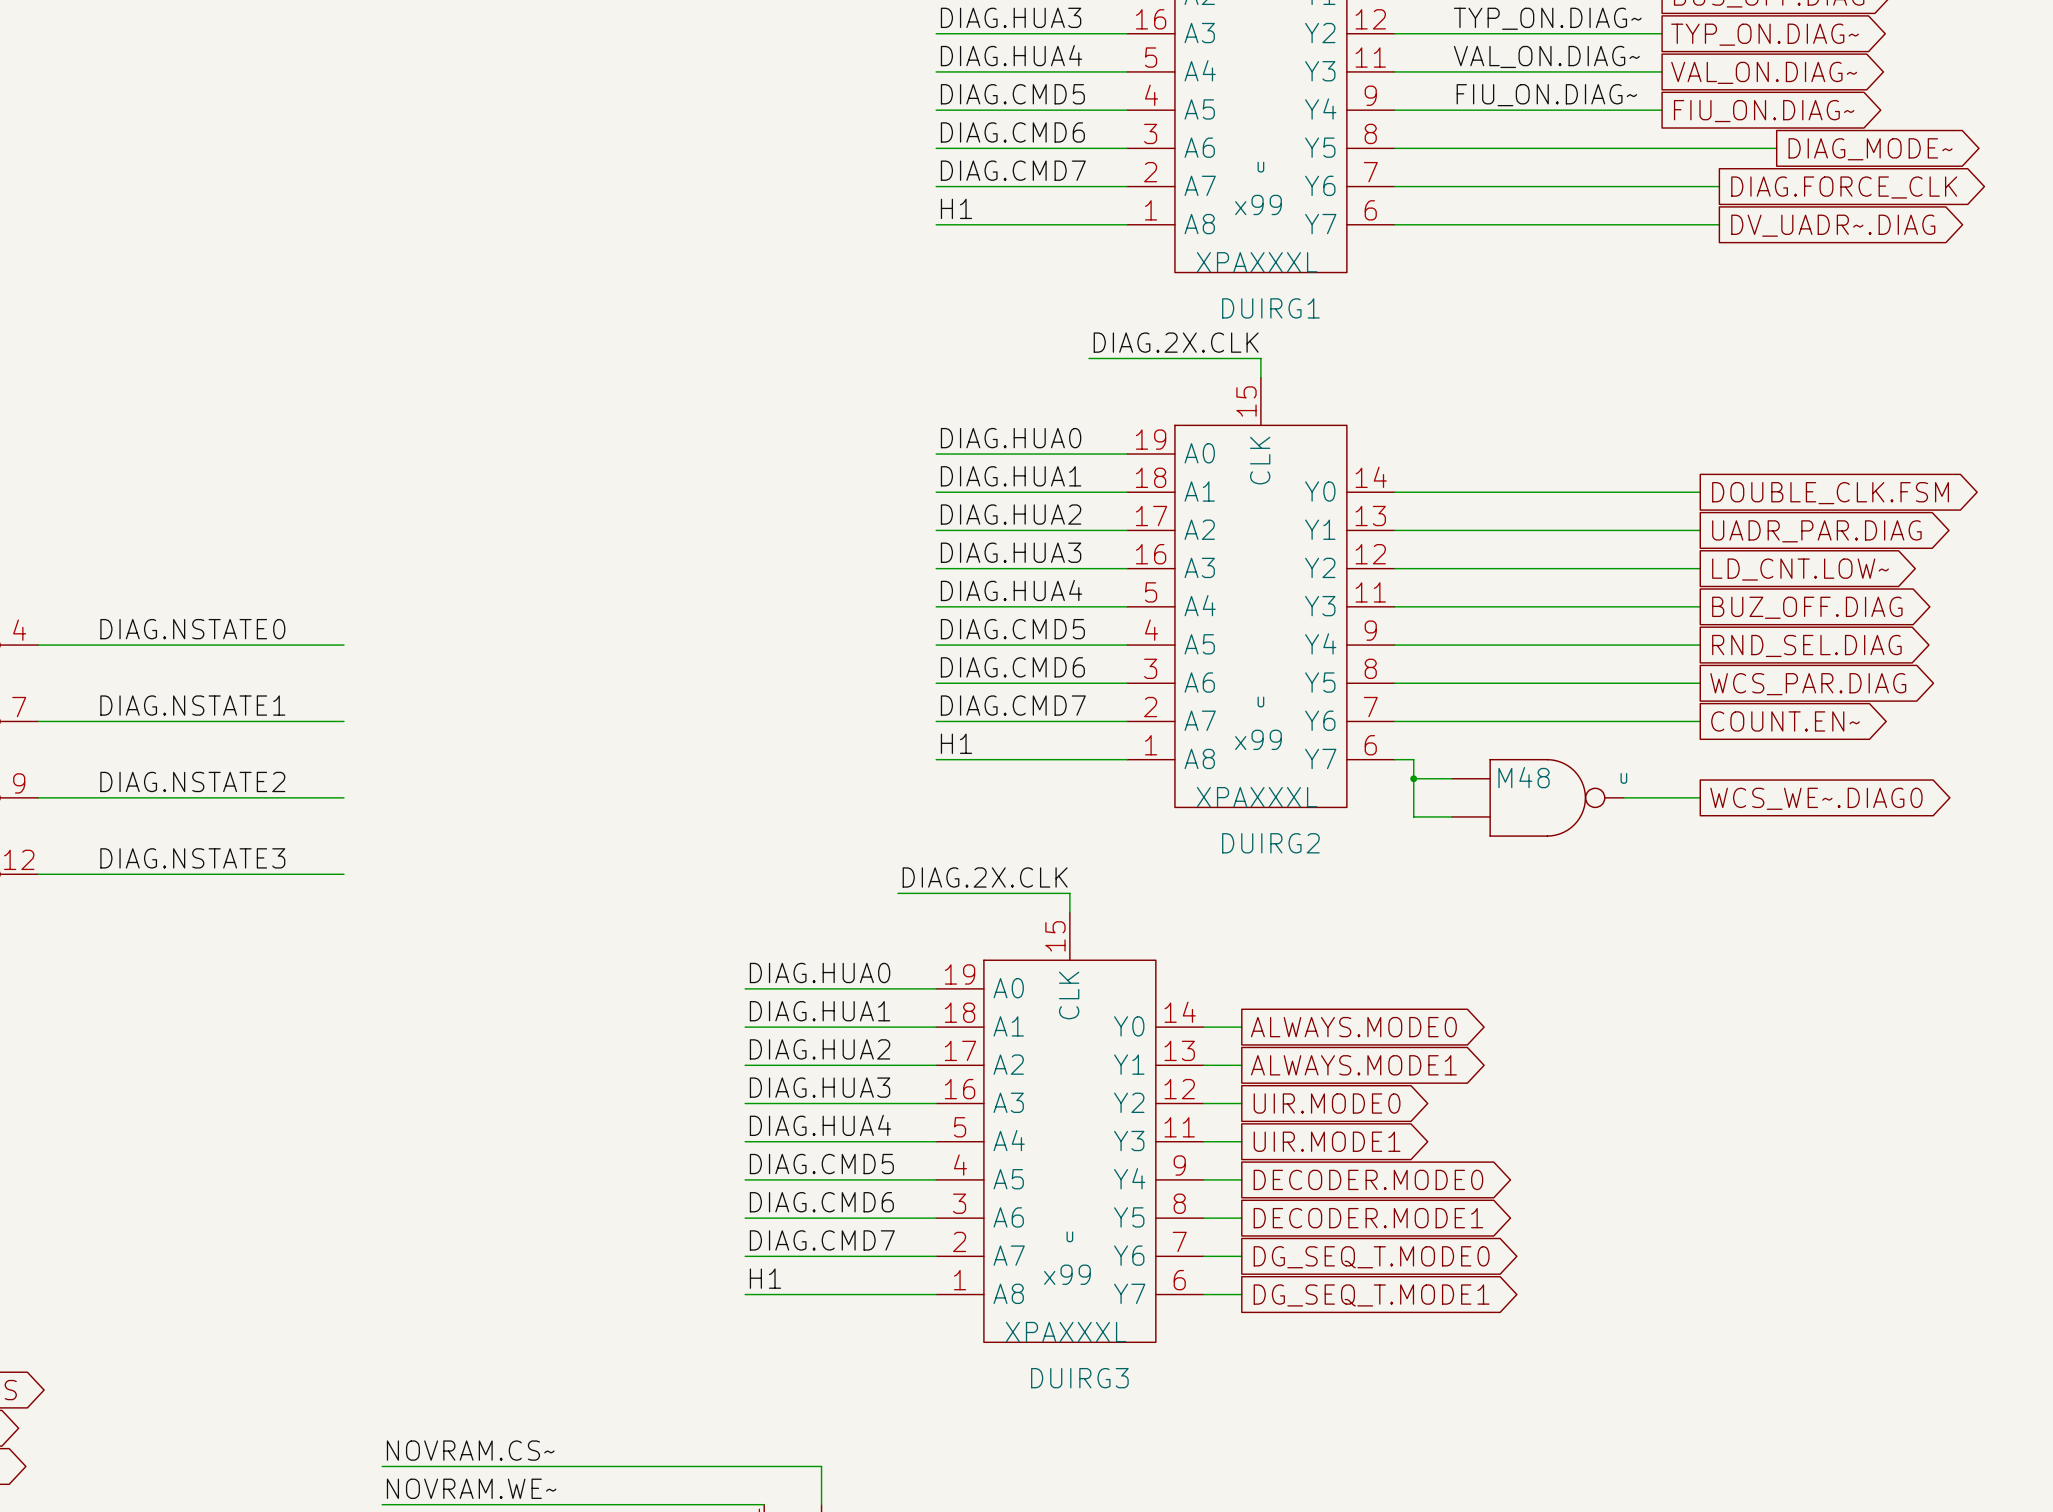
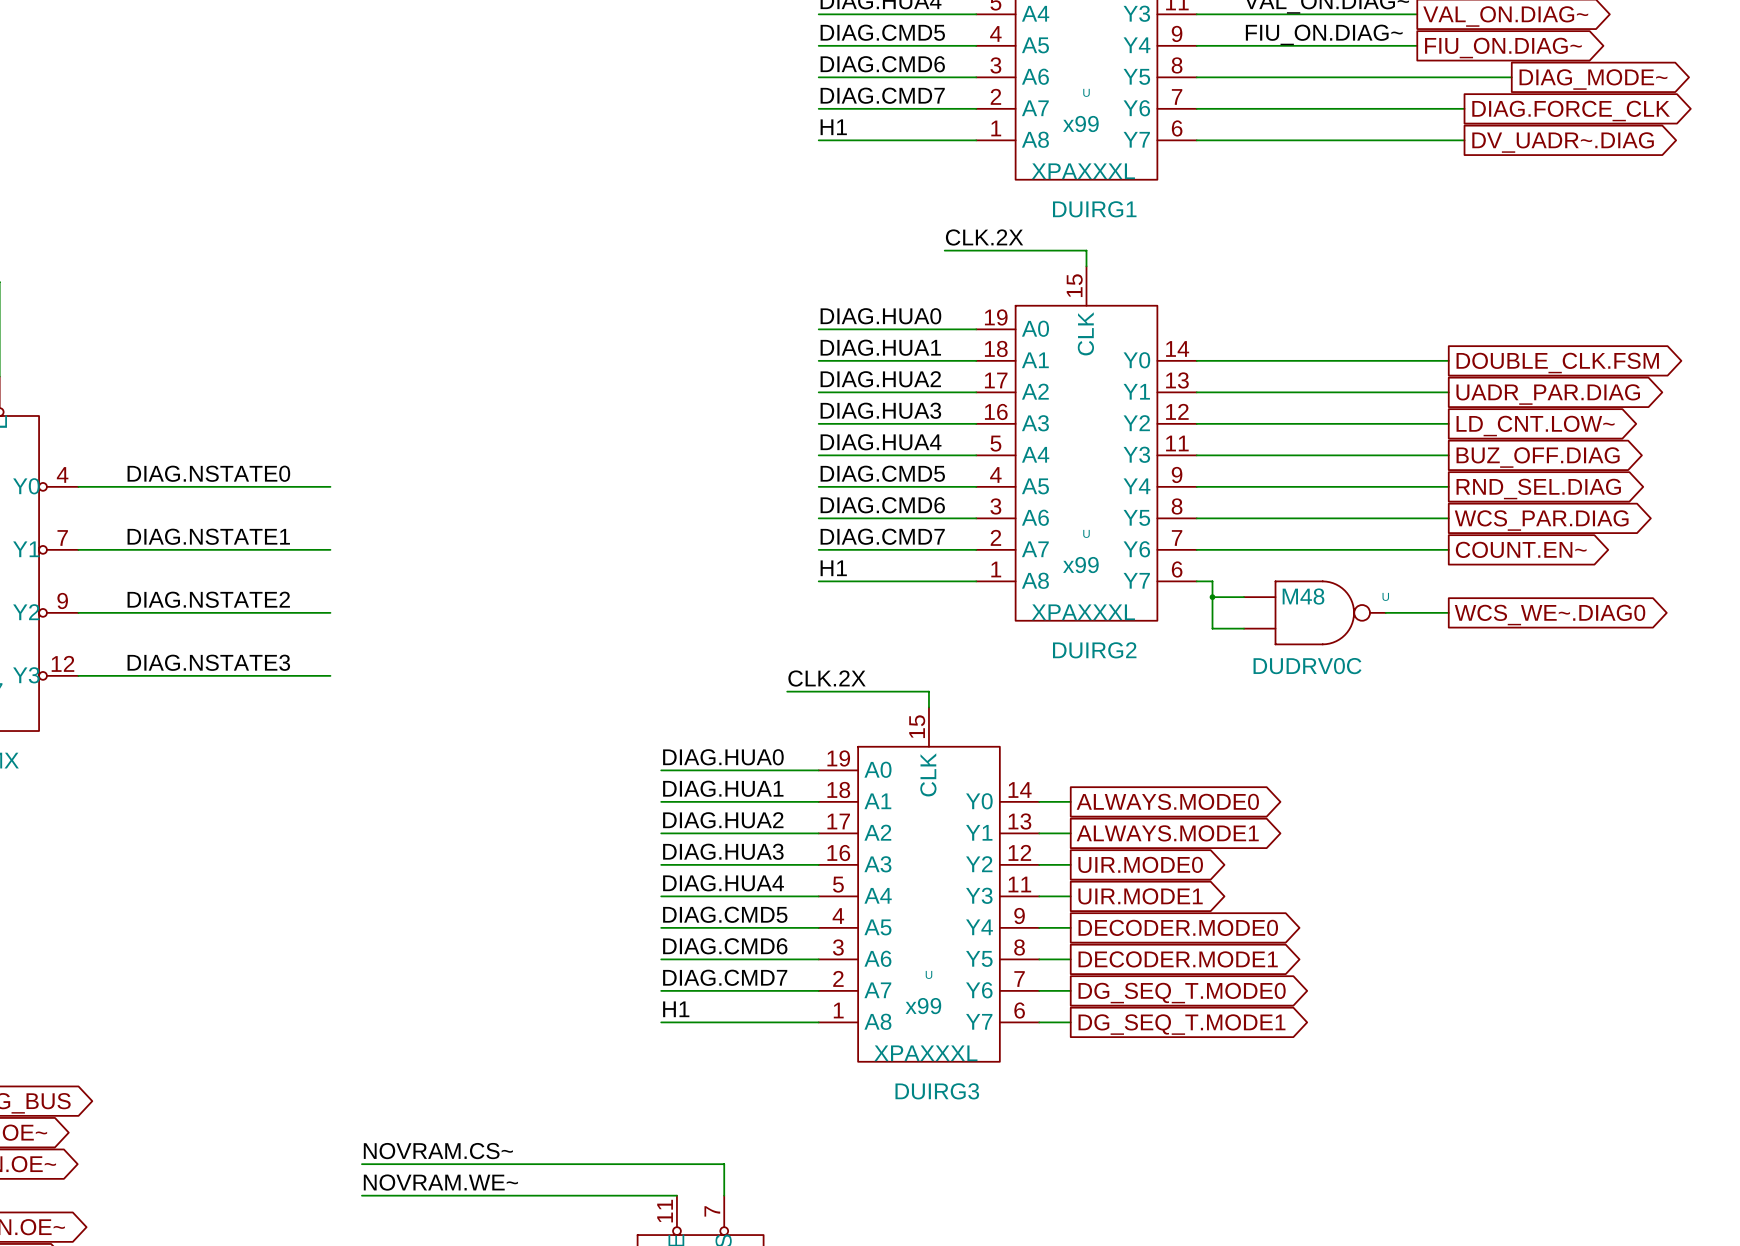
label: DIAG.2X.CLK (1176, 342) -> CLK.2X (984, 237)
U text: none -> DUDRV0C (1307, 666)
label: DIAG.2X.CLK (985, 877) -> CLK.2X (827, 678)

